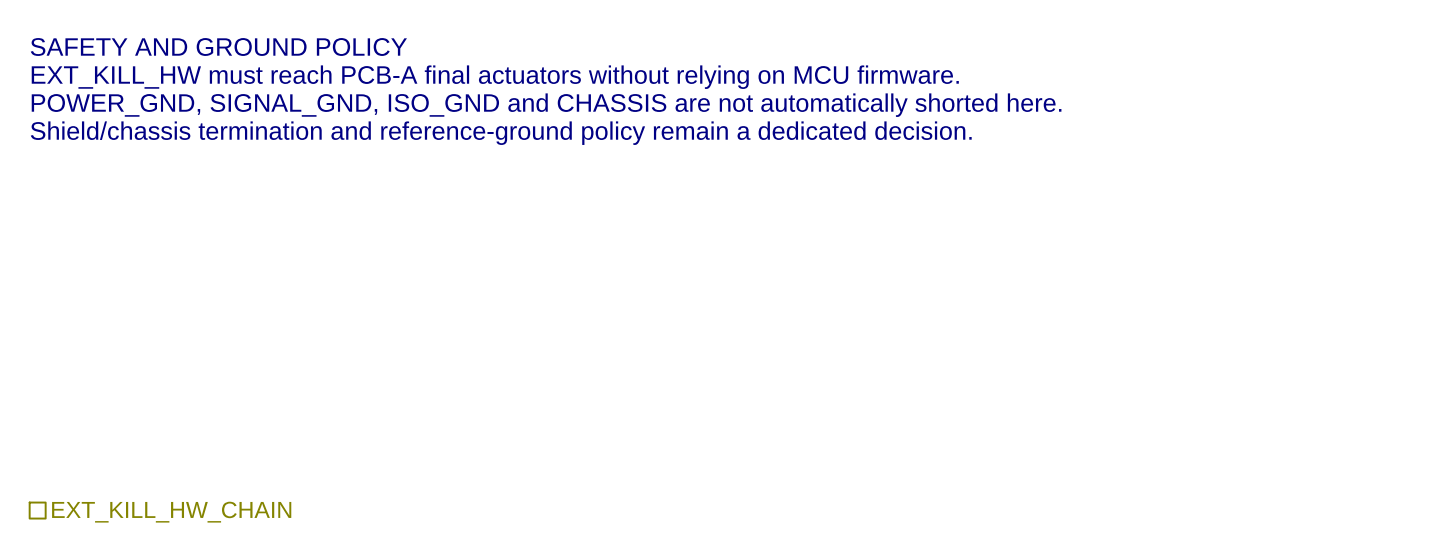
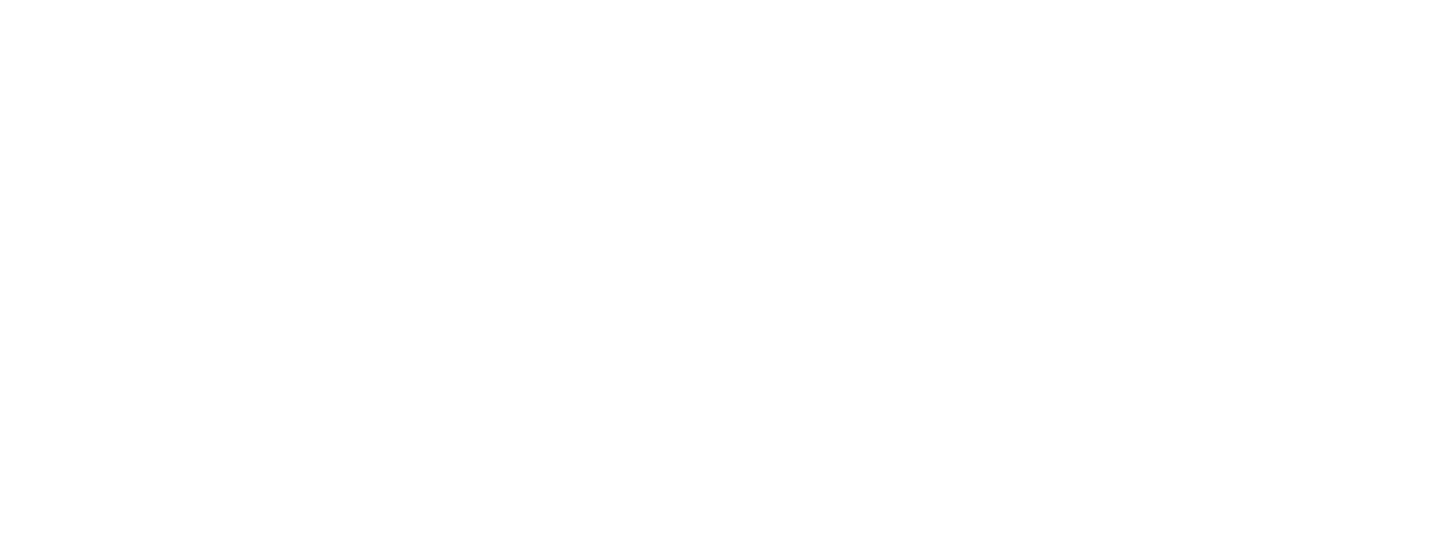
text: SAFETY AND GROUND POLICY (218, 47) -> none
text: EXT_KILL_HW must reach PCB-A final actuators without relying on MCU firmware. (495, 77) -> none
text: POWER_GND, SIGNAL_GND, ISO_GND and CHASSIS are not automatically shorted here. (546, 105) -> none
text: Shield/chassis termination and reference-ground policy remain a dedicated decision. (501, 133) -> none
hierarchical label: EXT_KILL_HW_CHAIN (171, 512) -> none

